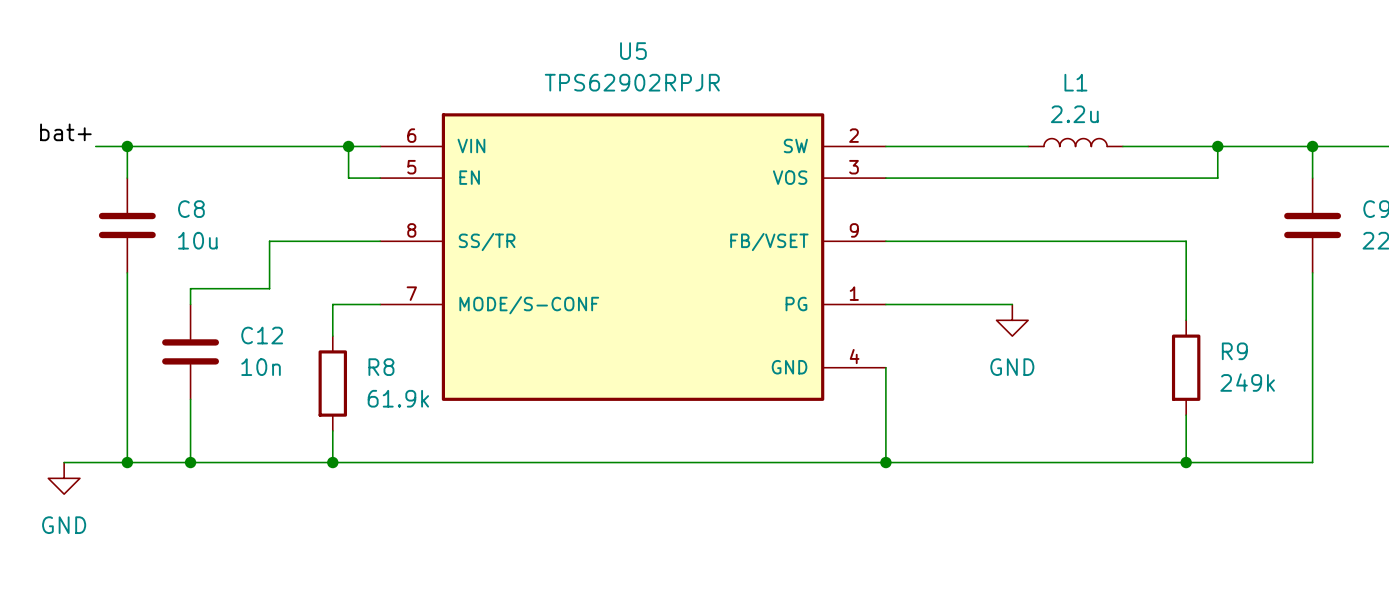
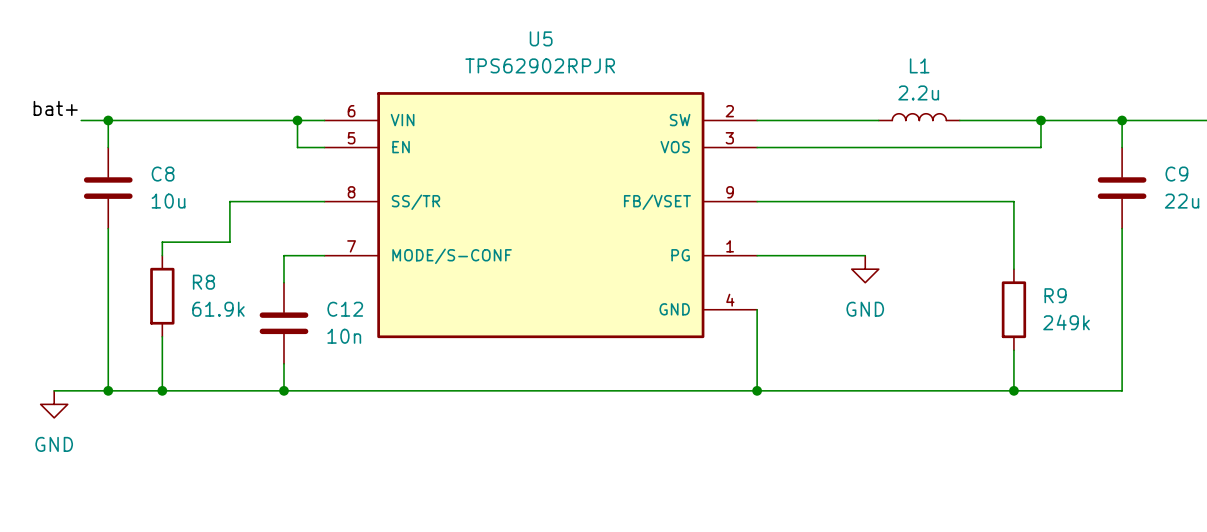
C12 position: (190, 351) -> (283, 323)
R8 position: (332, 383) -> (162, 296)

